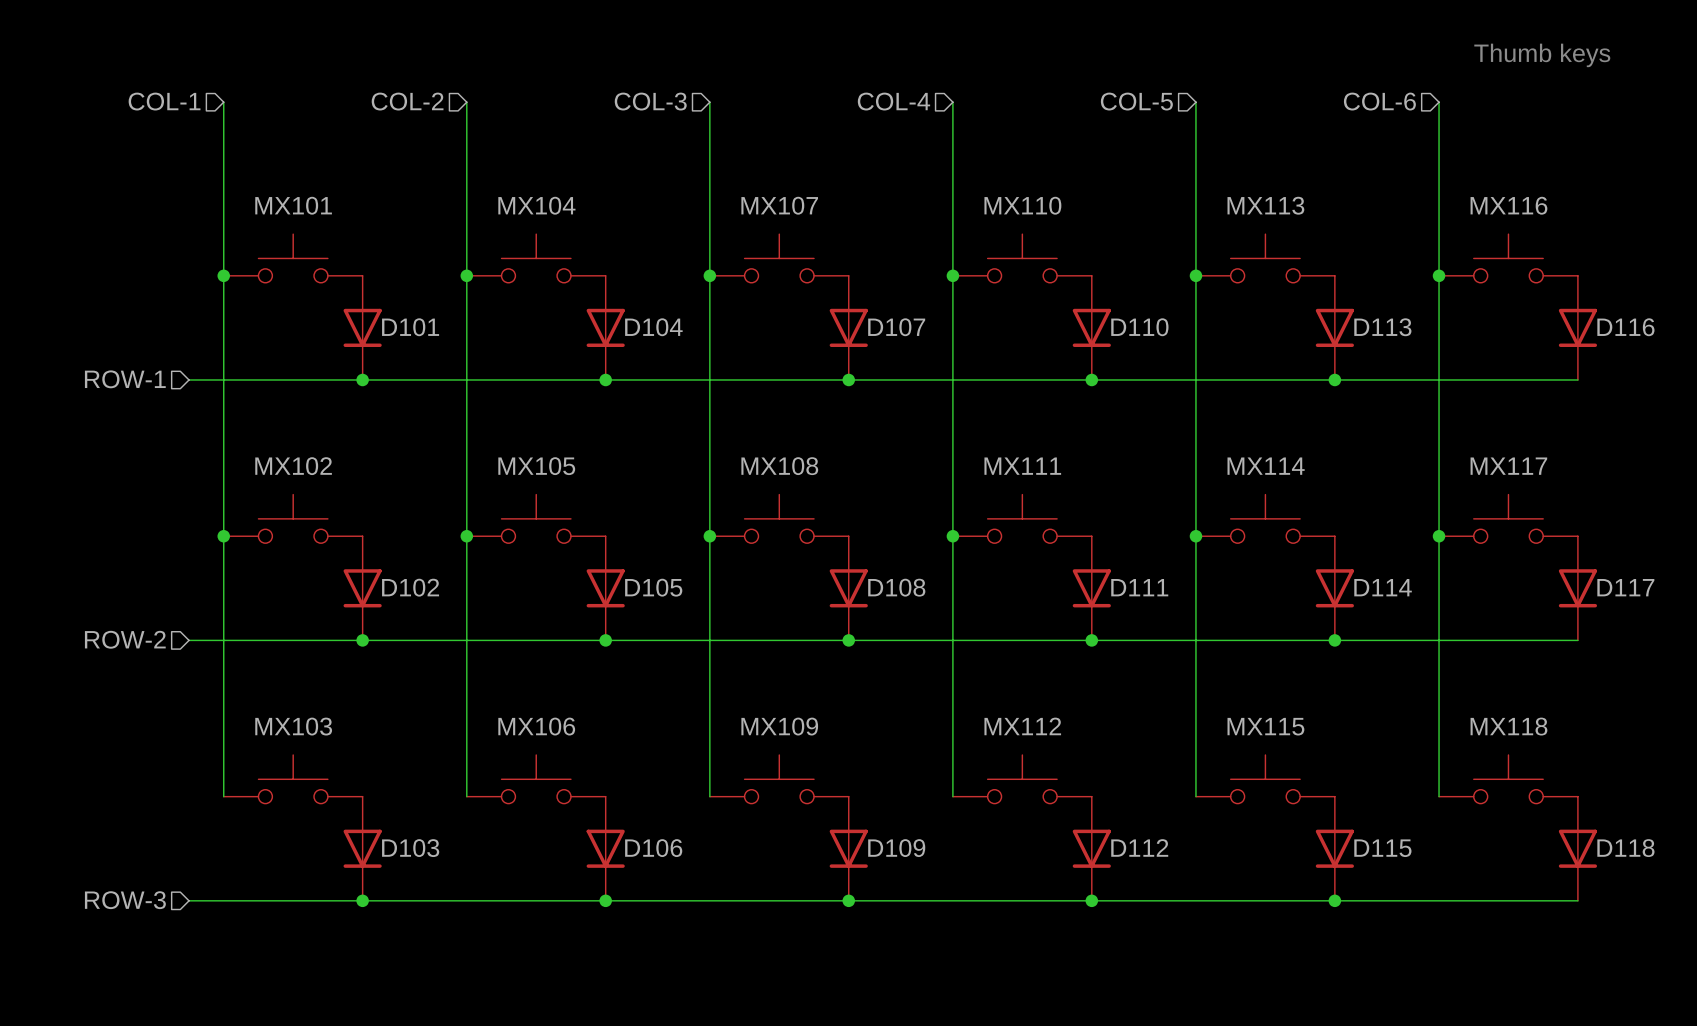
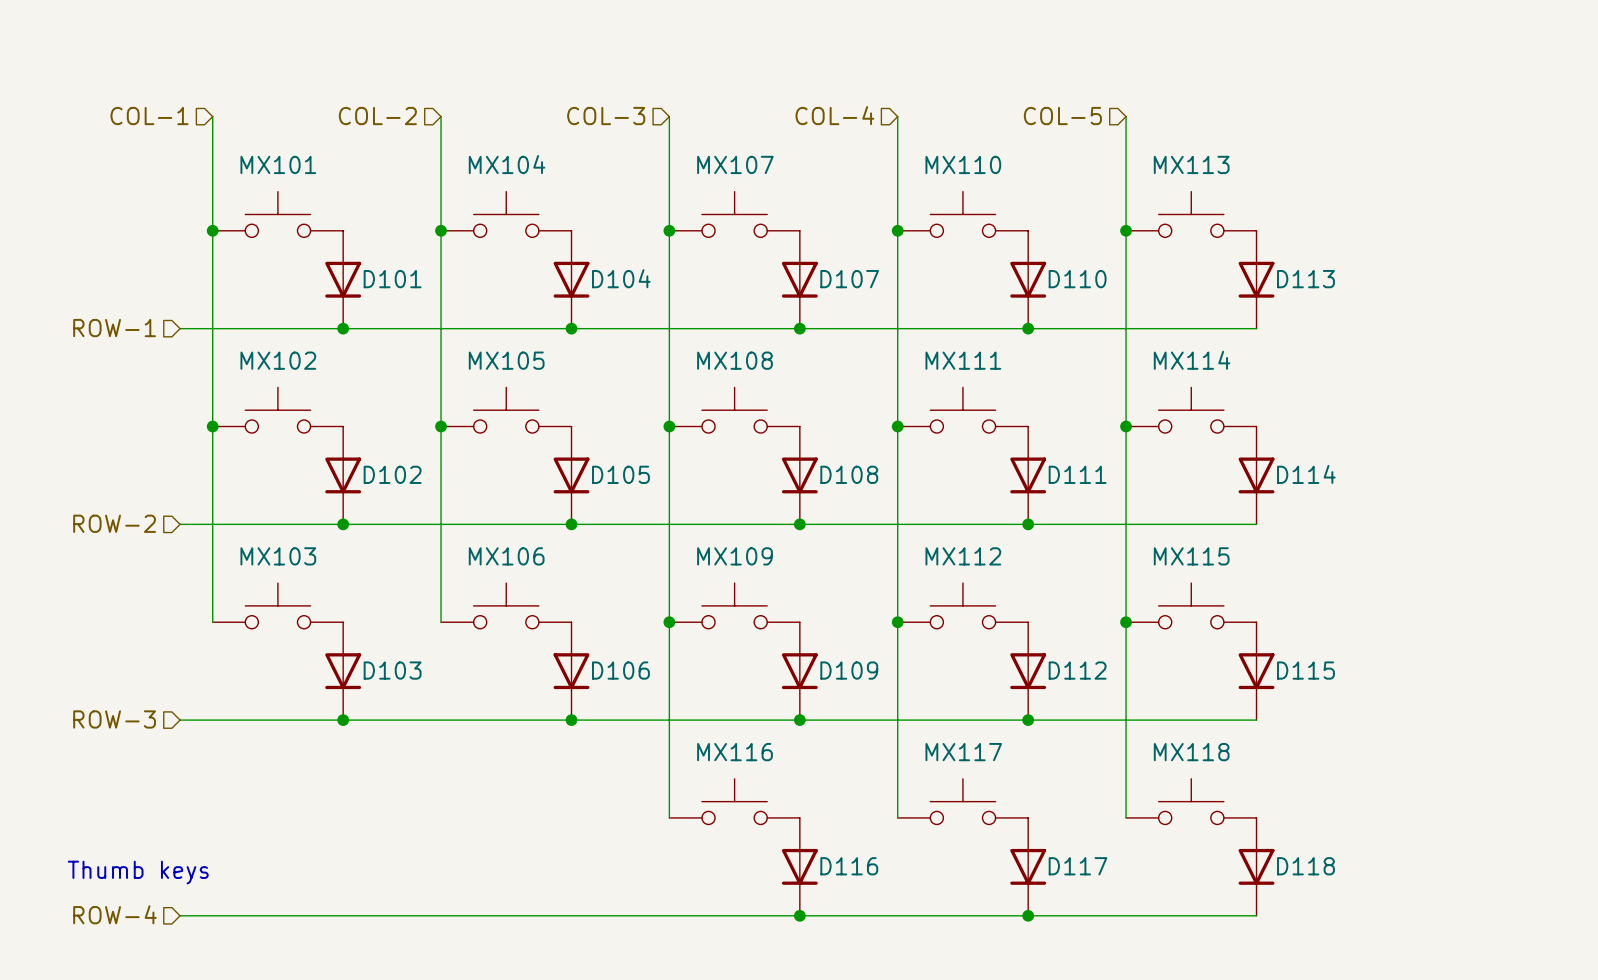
text: Thumb keys (1542, 55) -> none
hierarchical label: COL-6 (1379, 101) -> none
wire: (1439, 102) (1439, 796) -> none
MX101 position: (293, 258) -> (277, 214)
MX104 position: (536, 258) -> (506, 214)
MX107 position: (779, 258) -> (734, 214)
MX110 position: (1022, 258) -> (962, 214)
MX113 position: (1265, 258) -> (1191, 214)
MX116 position: (1508, 258) -> (734, 801)
junction position: (223, 275) -> (212, 230)
junction position: (466, 275) -> (441, 230)
junction position: (709, 275) -> (669, 230)
junction position: (952, 275) -> (897, 230)
junction position: (1195, 275) -> (1126, 230)
junction: (1439, 275) -> none
wire: none -> (180, 328) (1256, 328)
D101 position: (362, 327) -> (343, 279)
D104 position: (605, 327) -> (571, 279)
D107 position: (848, 327) -> (799, 279)
D110 position: (1091, 327) -> (1028, 279)
D113 position: (1334, 327) -> (1256, 279)
D116 position: (1577, 327) -> (799, 866)
hierarchical label position: ROW-1 (125, 379) -> ROW-1 (114, 328)
wire: (189, 379) (1577, 379) -> none
junction position: (362, 379) -> (343, 328)
junction position: (605, 379) -> (571, 328)
junction position: (848, 379) -> (799, 328)
junction position: (1091, 379) -> (1028, 328)
junction: (1334, 379) -> none
junction: none -> (212, 426)
junction: none -> (441, 426)
junction: none -> (669, 426)
junction: none -> (897, 426)
junction: none -> (1126, 426)
MX102 position: (293, 518) -> (277, 410)
MX105 position: (536, 518) -> (506, 410)
MX108 position: (779, 518) -> (734, 410)
MX111 position: (1022, 518) -> (962, 410)
MX114 position: (1265, 518) -> (1191, 410)
MX117 position: (1508, 518) -> (962, 801)
wire: none -> (180, 524) (1256, 524)
junction: (223, 536) -> none
junction: none -> (343, 524)
junction: (466, 536) -> none
junction: none -> (571, 524)
junction: (709, 536) -> none
junction: none -> (799, 524)
junction: (952, 536) -> none
junction: none -> (1028, 524)
junction: (1195, 536) -> none
junction: (1439, 536) -> none
D102 position: (362, 588) -> (343, 475)
D105 position: (605, 588) -> (571, 475)
D108 position: (848, 588) -> (799, 475)
D111 position: (1091, 588) -> (1028, 475)
D114 position: (1334, 588) -> (1256, 475)
D117 position: (1577, 588) -> (1028, 866)
hierarchical label position: ROW-2 (125, 639) -> ROW-2 (114, 523)
wire: (189, 640) (1577, 640) -> none
wire: (223, 640) (223, 796) -> none
junction: (362, 640) -> none
wire: (466, 640) (466, 796) -> none
junction: (605, 640) -> none
junction: none -> (669, 622)
junction: (848, 640) -> none
junction: none -> (897, 622)
junction: (1091, 640) -> none
junction: none -> (1126, 622)
junction: (1334, 640) -> none
wire: none -> (180, 720) (1256, 720)
junction: none -> (343, 720)
junction: none -> (571, 720)
junction: none -> (799, 720)
junction: none -> (1028, 720)
MX103 position: (293, 779) -> (277, 605)
MX106 position: (536, 779) -> (506, 605)
MX109 position: (779, 779) -> (734, 605)
MX112 position: (1022, 779) -> (962, 605)
MX115 position: (1265, 779) -> (1191, 605)
MX118 position: (1508, 779) -> (1191, 801)
wire: none -> (669, 769) (669, 817)
wire: none -> (897, 769) (897, 817)
wire: none -> (1126, 769) (1126, 817)
D103 position: (362, 848) -> (343, 671)
D106 position: (605, 848) -> (571, 671)
D109 position: (848, 848) -> (799, 671)
D112 position: (1091, 848) -> (1028, 671)
D115 position: (1334, 848) -> (1256, 671)
D118 position: (1577, 848) -> (1256, 866)
hierarchical label position: ROW-3 (125, 900) -> ROW-3 (114, 719)
wire: (189, 900) (1577, 900) -> none
junction: (362, 900) -> none
junction: (605, 900) -> none
junction position: (848, 900) -> (799, 915)
junction position: (1091, 900) -> (1028, 915)
junction: (1334, 900) -> none
text: none -> Thumb keys (138, 872)
hierarchical label: none -> ROW-4 (114, 914)
wire: none -> (180, 915) (1256, 915)

